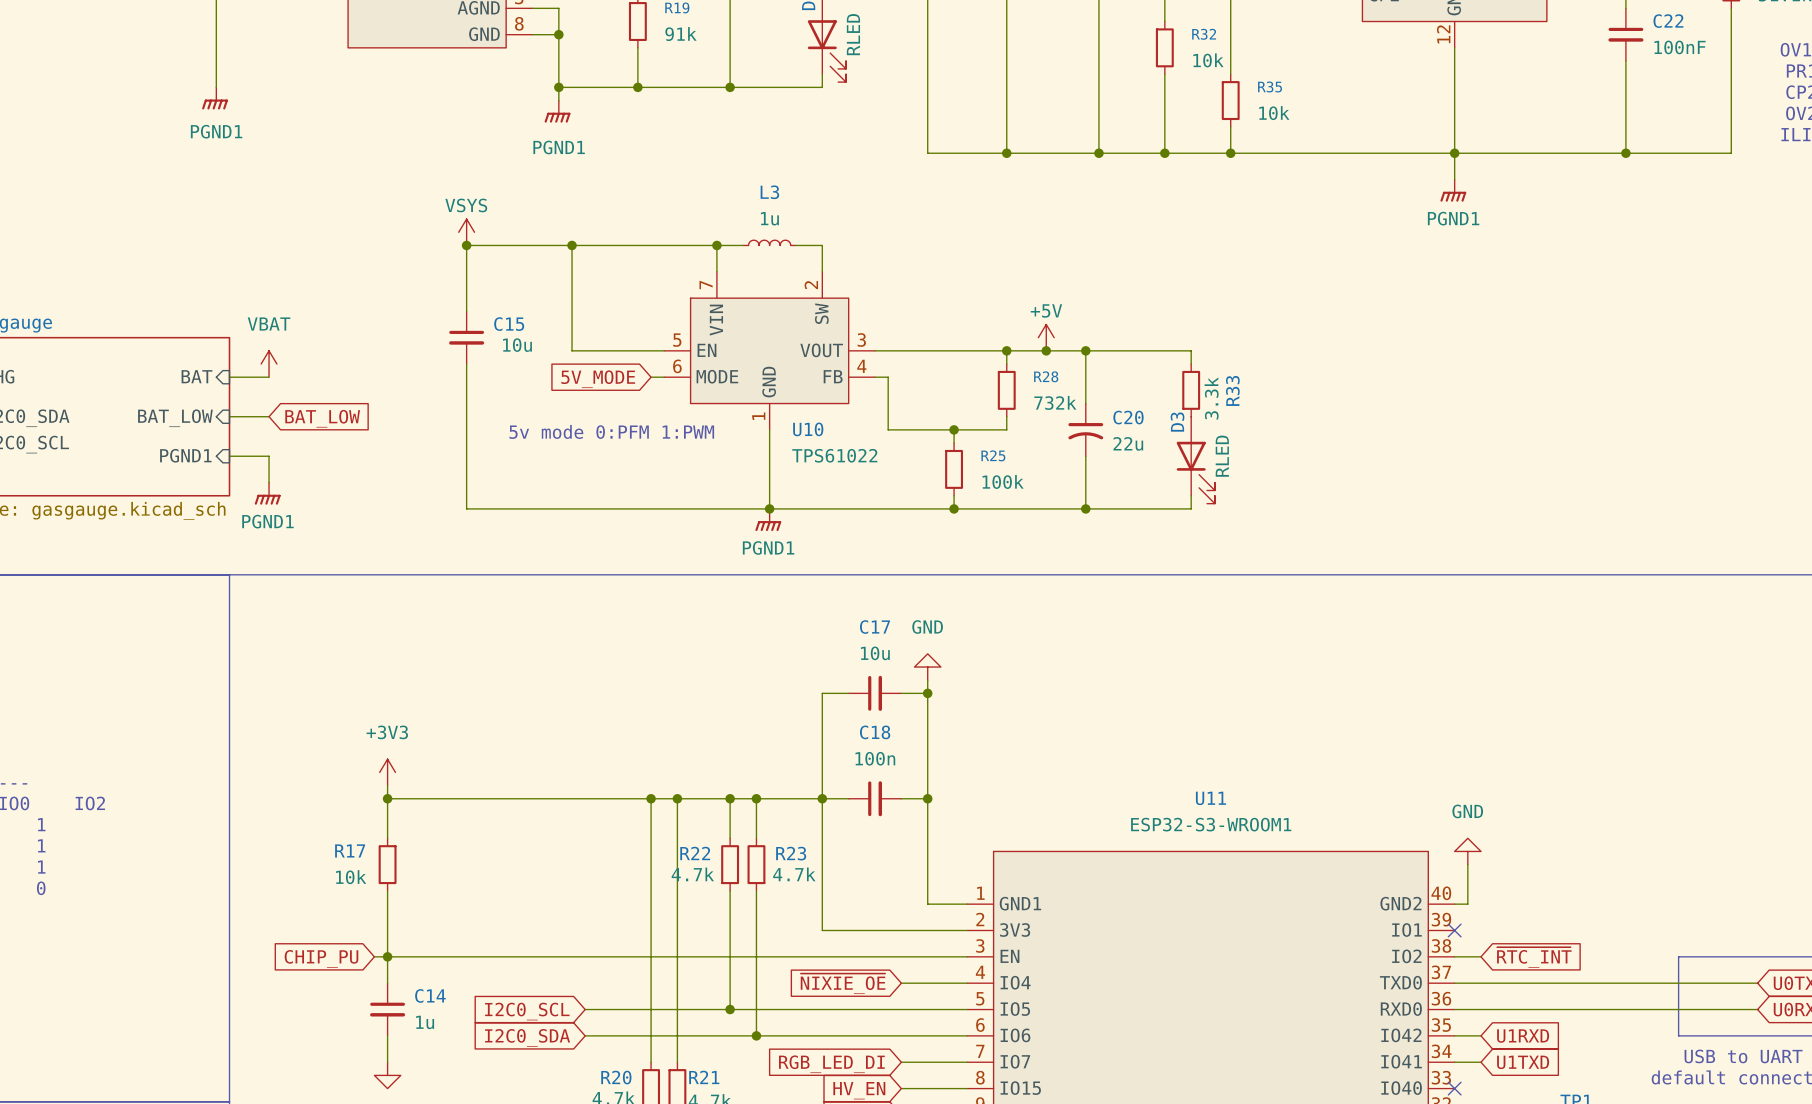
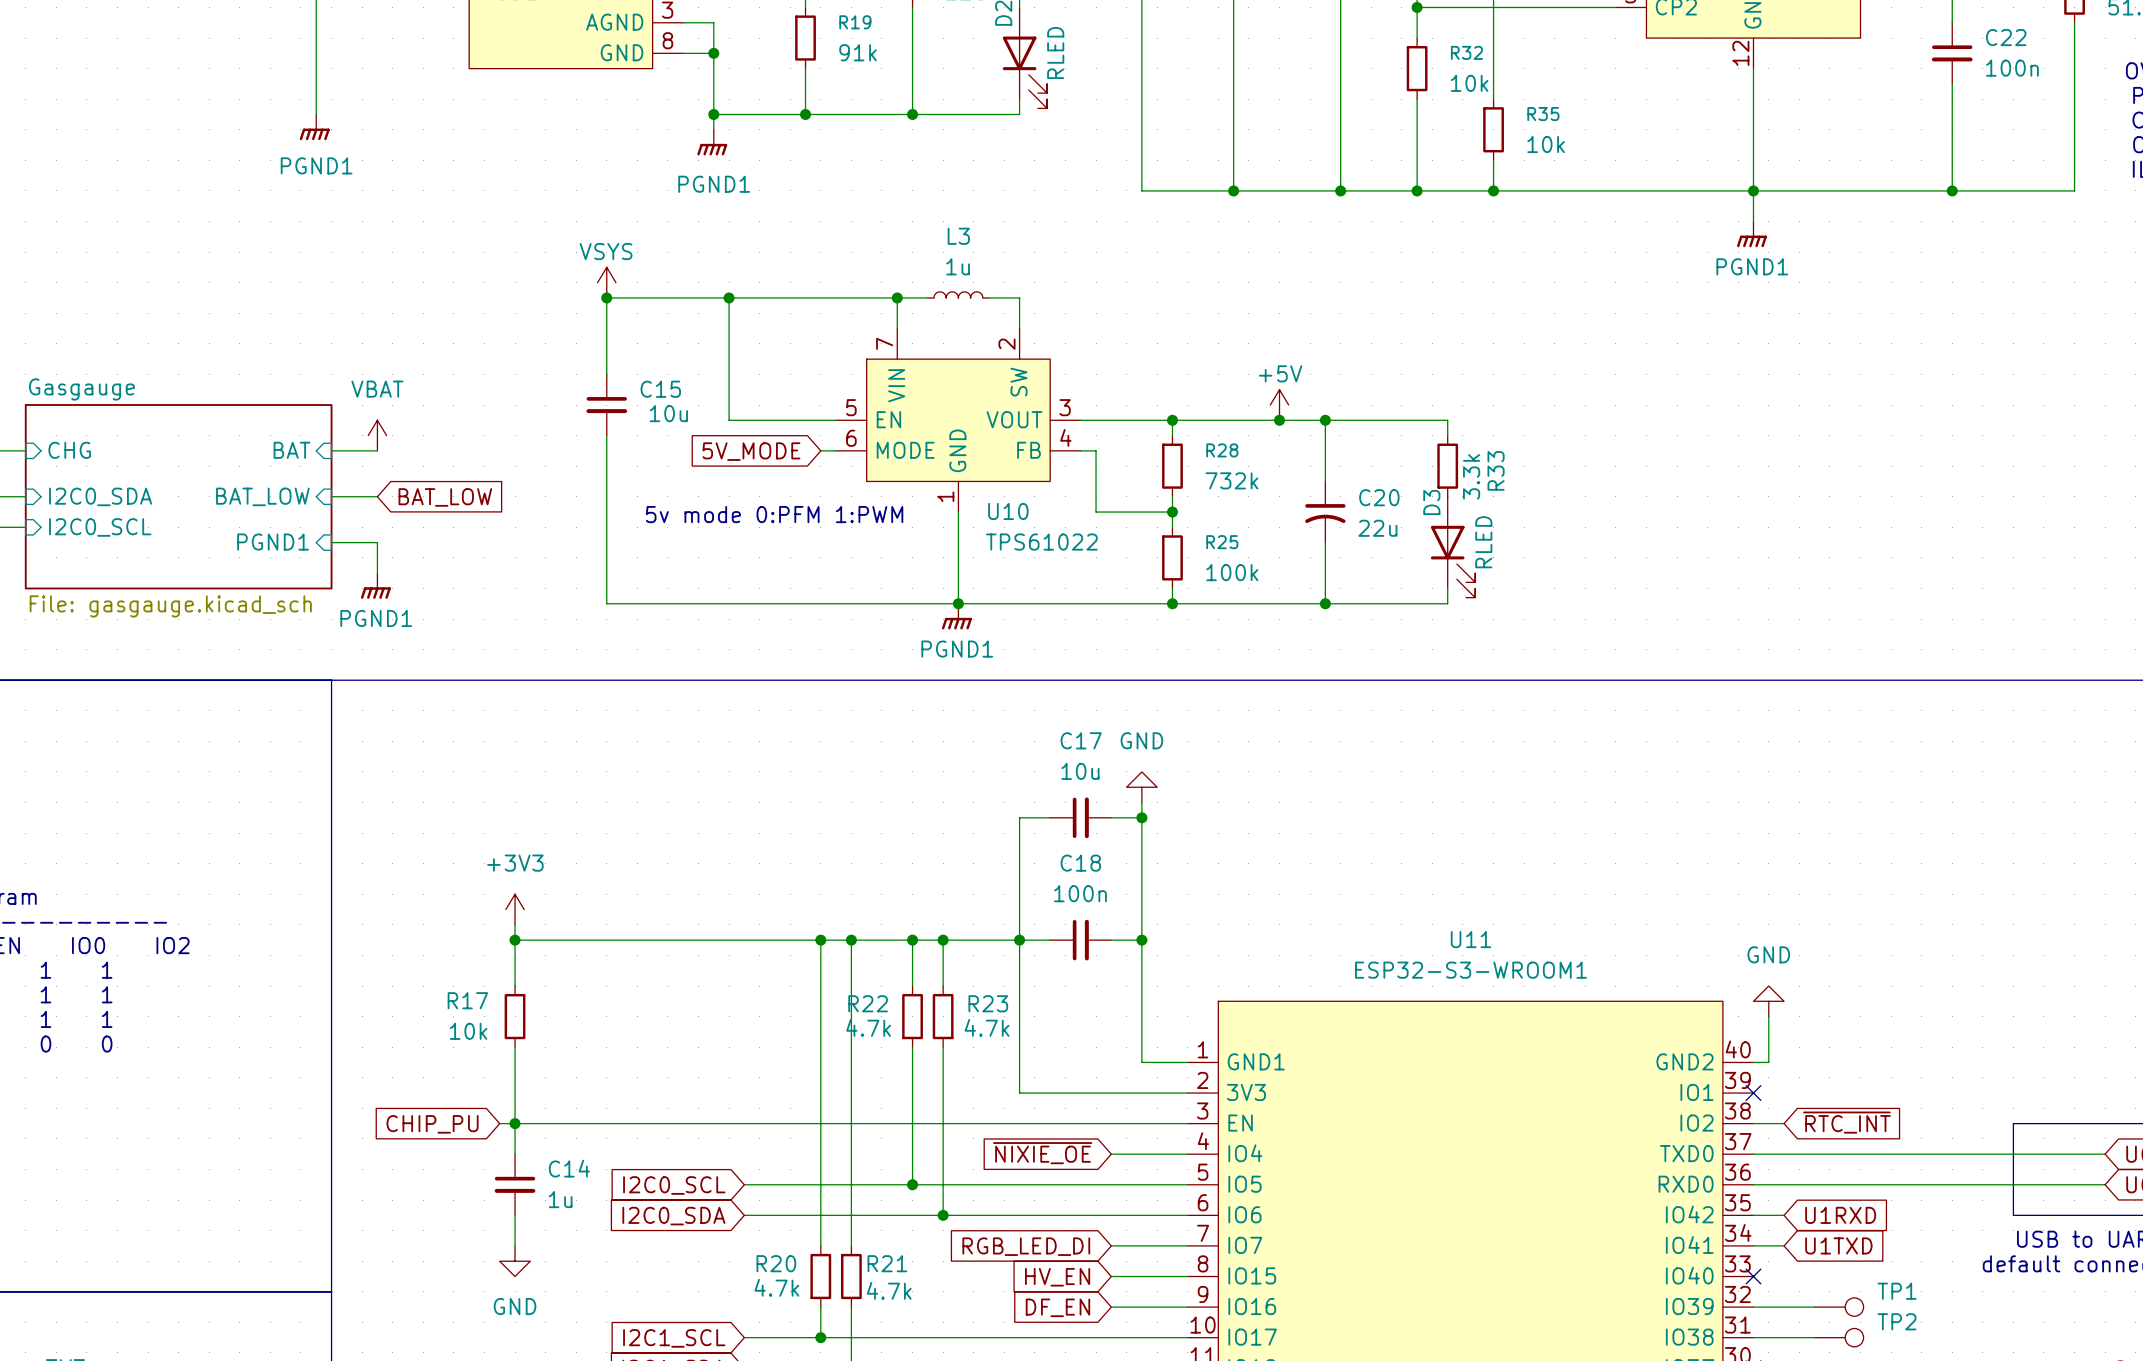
C22 value: 100nF (1680, 47) -> 100n (2012, 68)
wire: (1006, 350) (1006, 364) -> (1172, 420) (1172, 435)
junction position: (1006, 350) -> (1172, 420)
R28 position: (1006, 390) -> (1172, 466)
wire: (1006, 416) (1006, 429) (954, 429) -> (1172, 496) (1172, 512)

